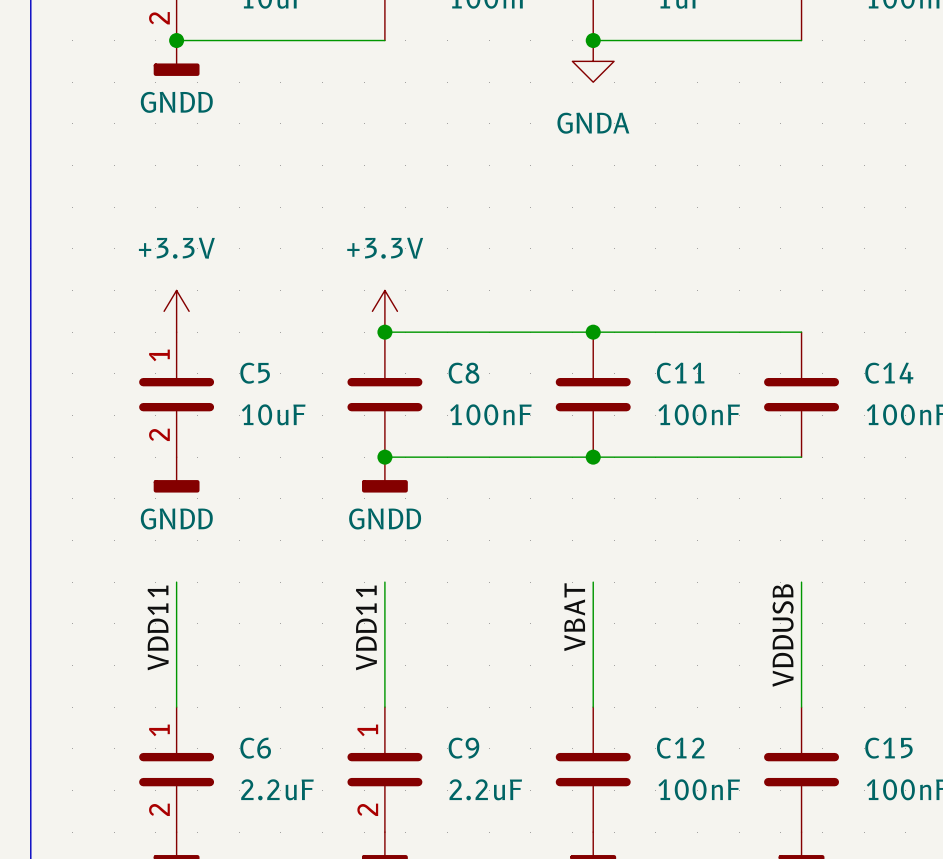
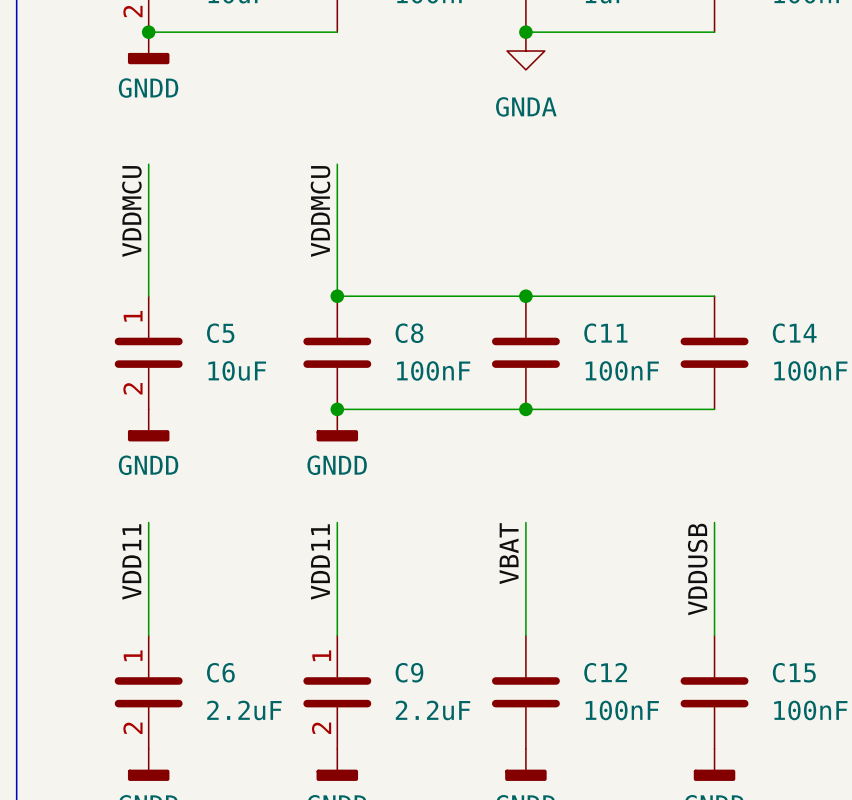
wire: none -> (148, 164) (148, 296)
wire: none -> (337, 164) (337, 296)
label: none -> VDDMCU (131, 211)
label: none -> VDDMCU (320, 211)
power symbol: +3.3V (176, 311) -> none
power symbol: +3.3V (384, 311) -> none

